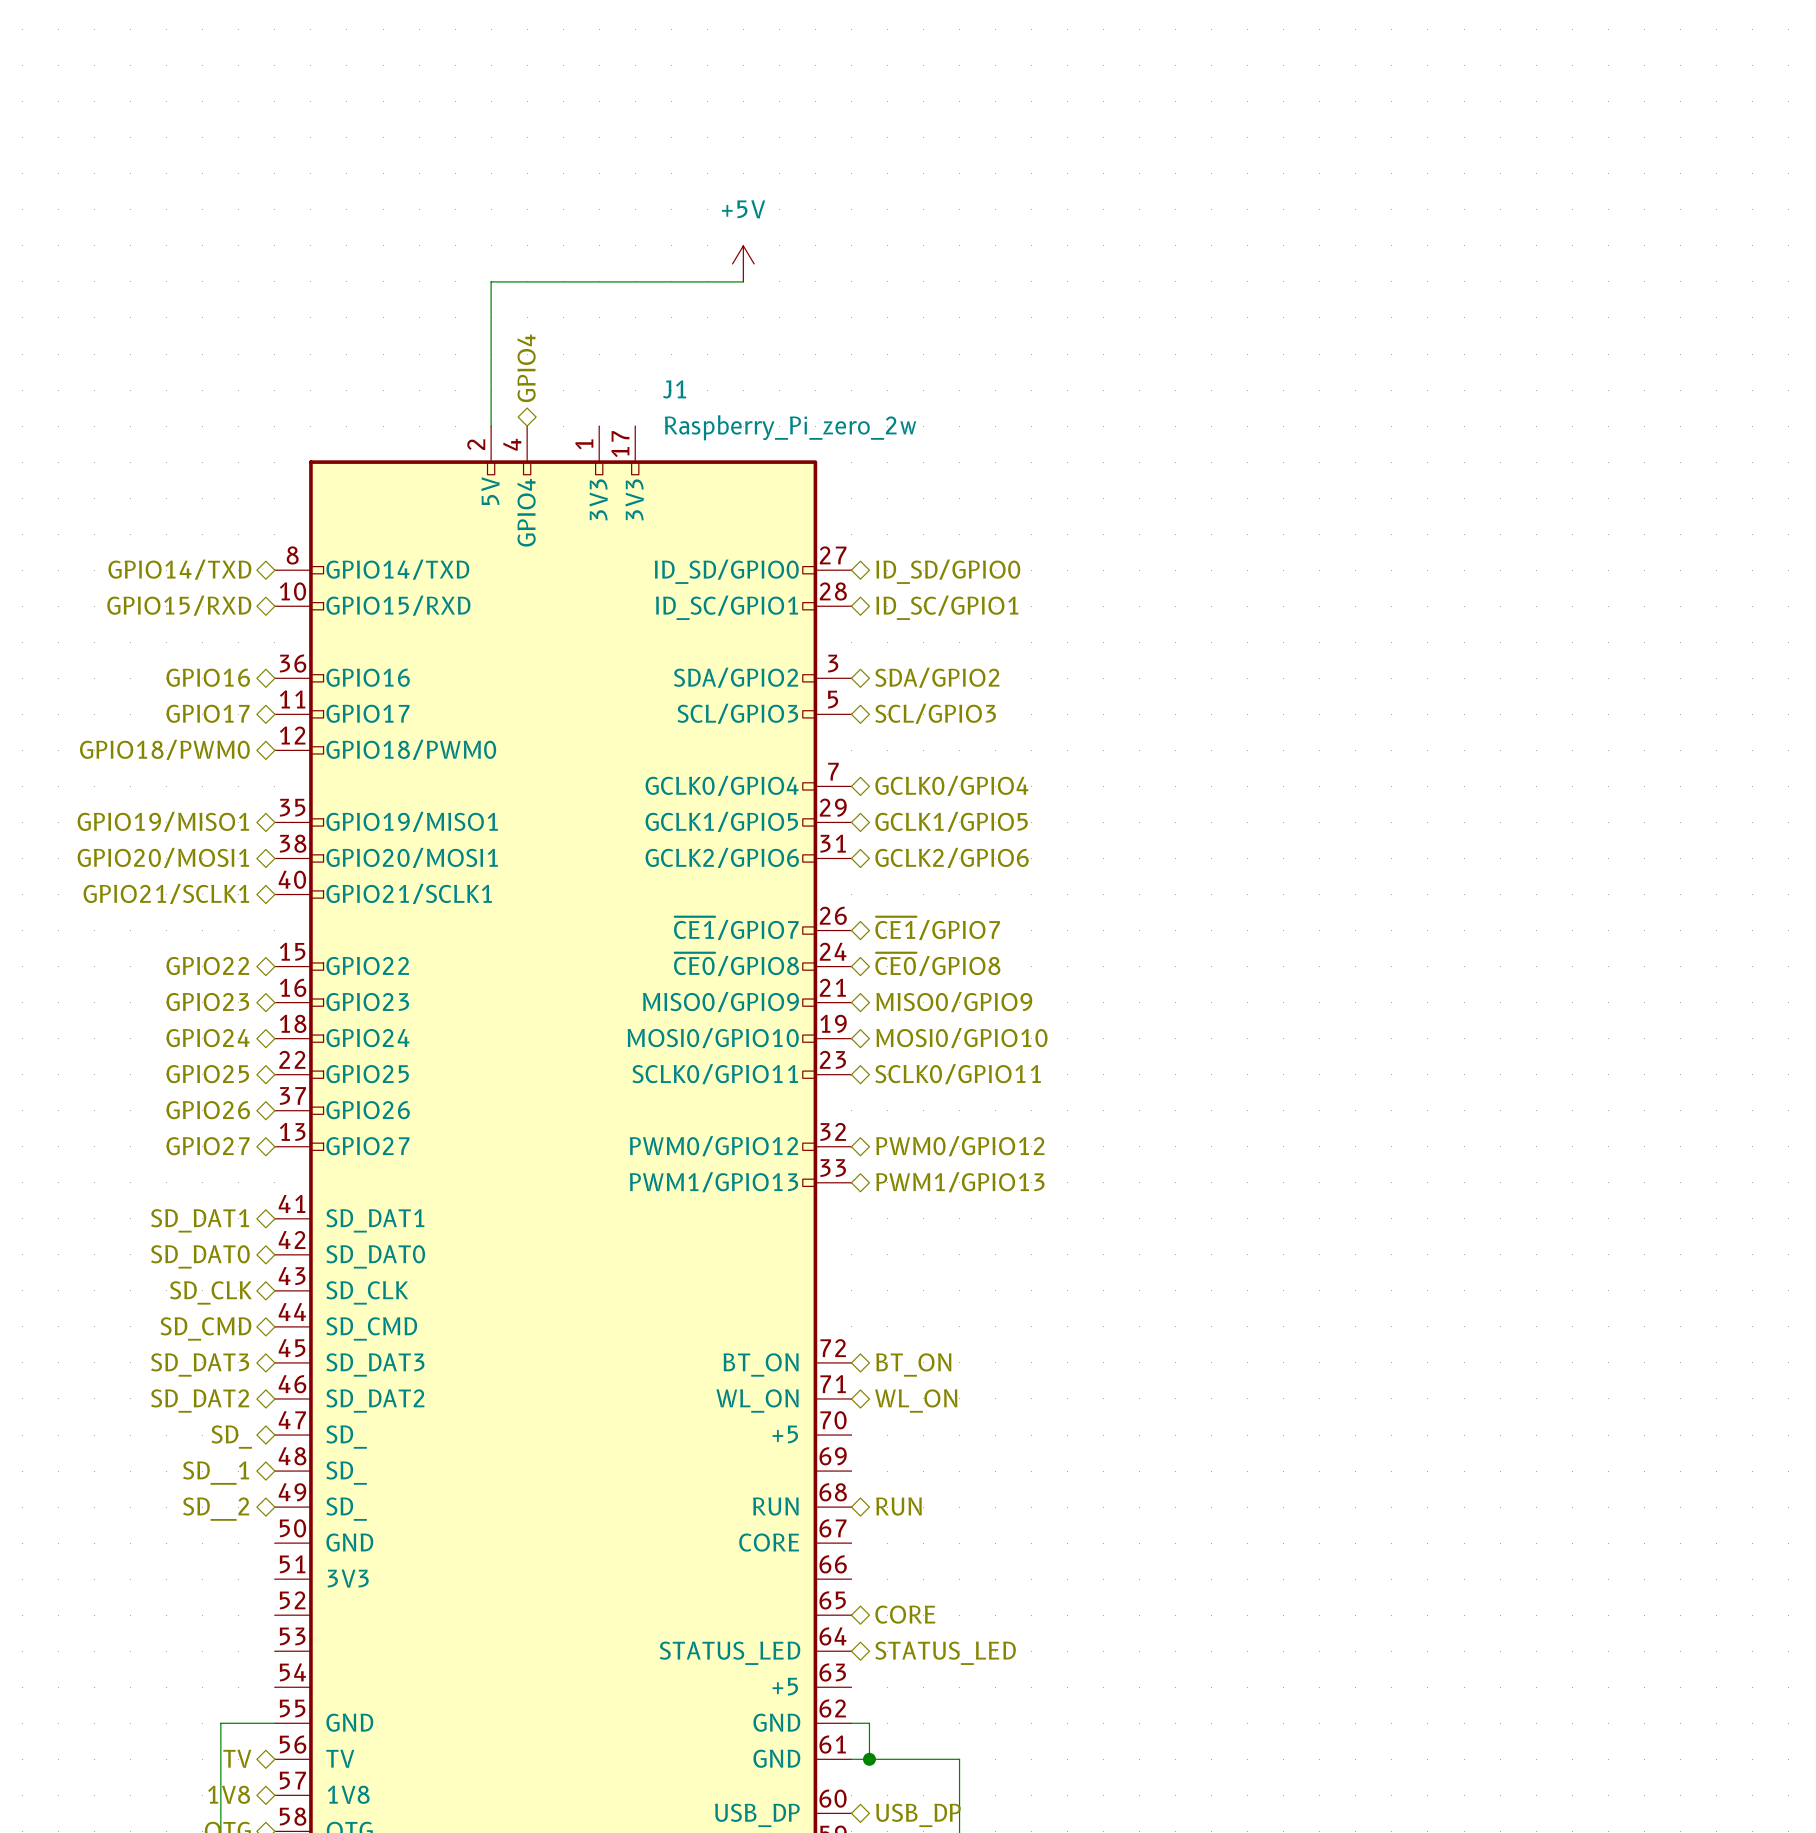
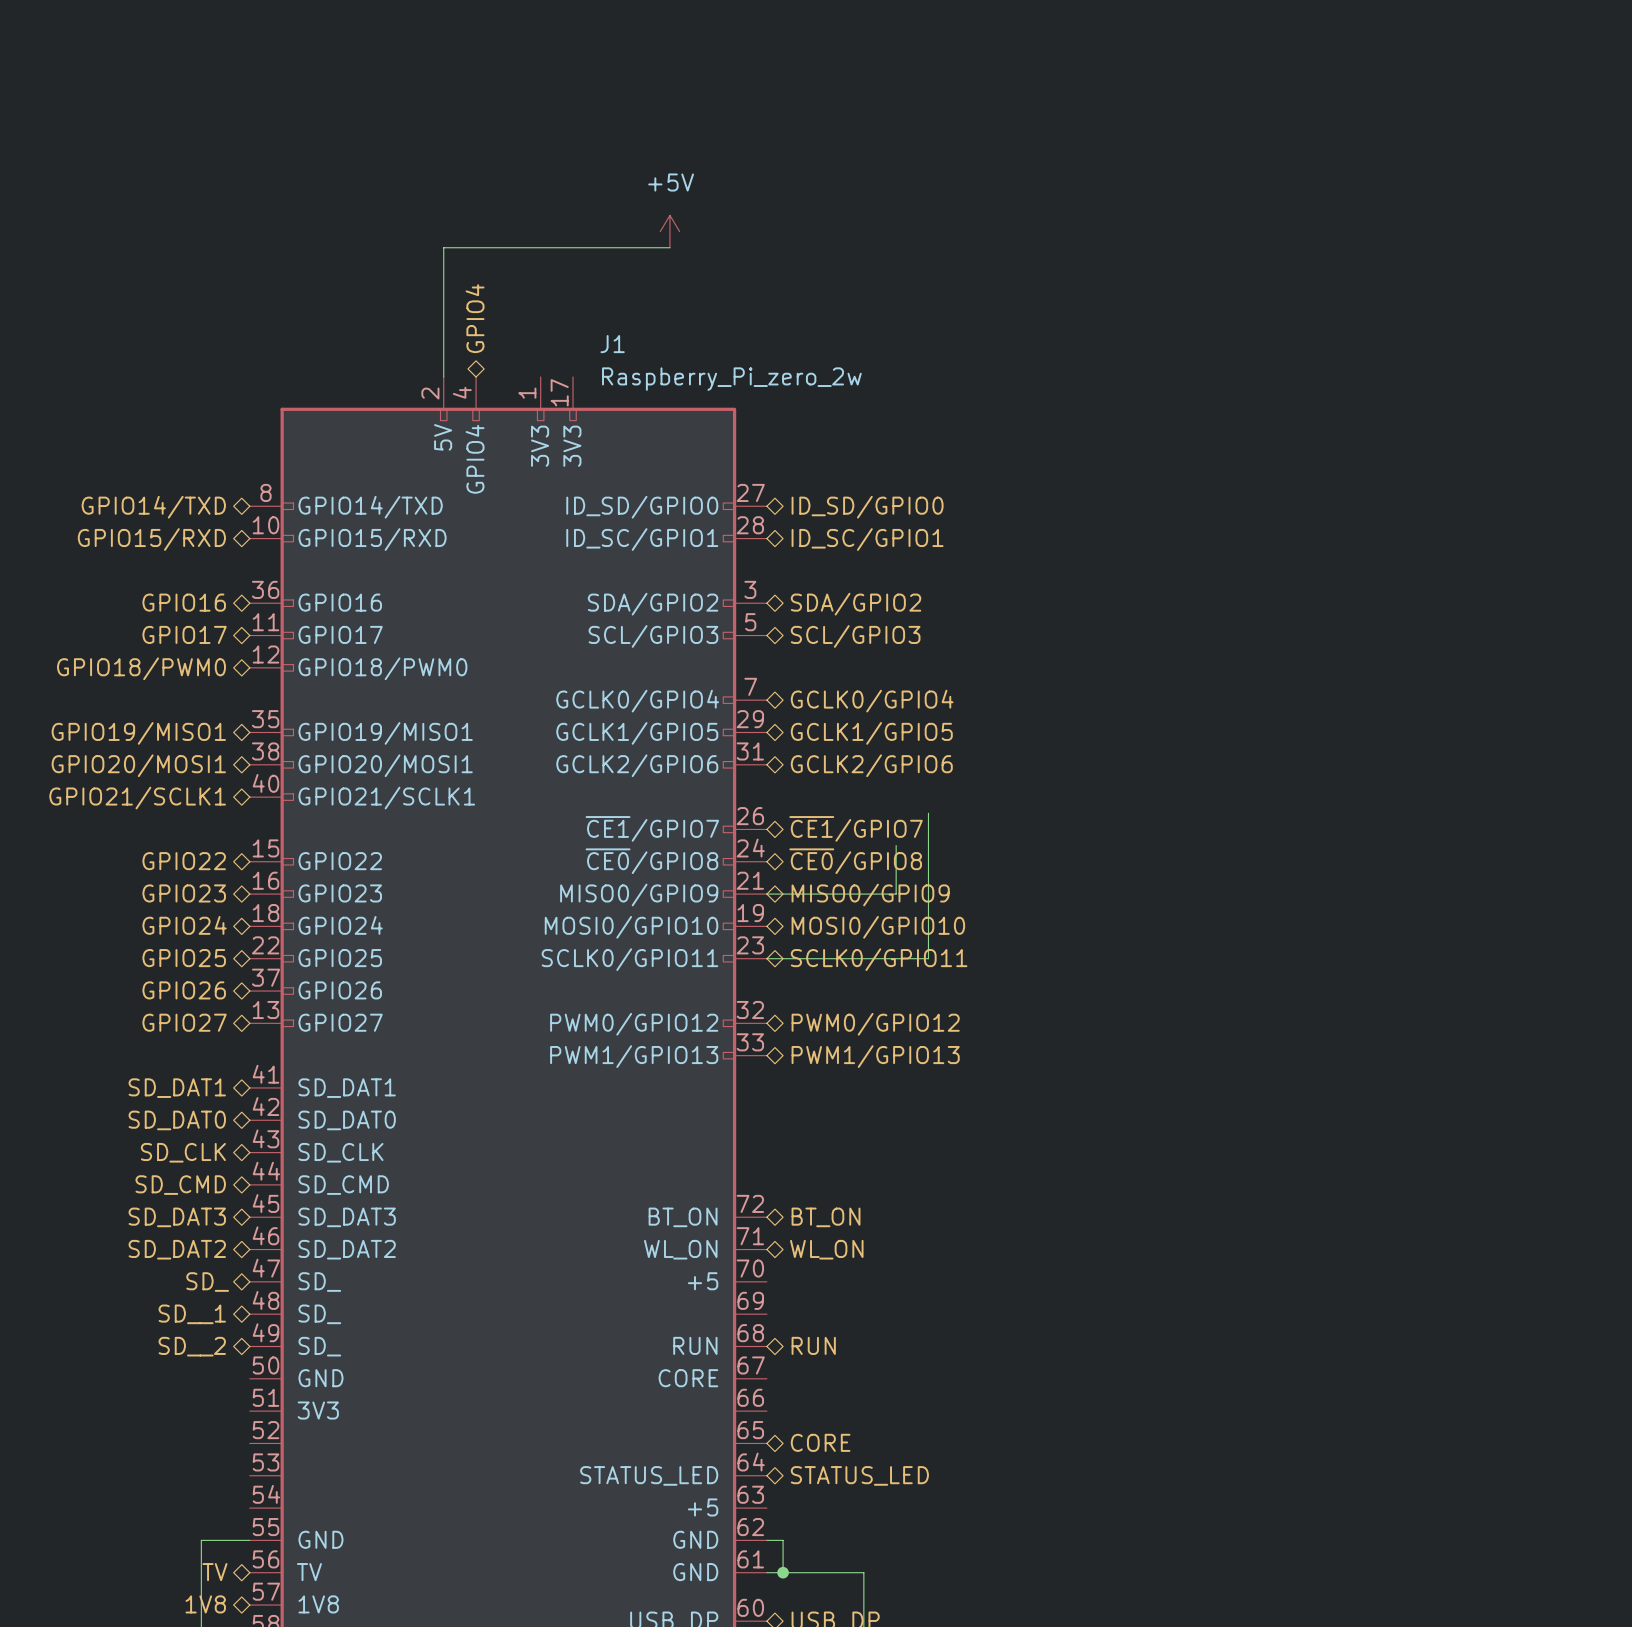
wire: none -> (928, 813) (928, 958) (766, 958)
wire: none -> (896, 845) (896, 894) (766, 894)

